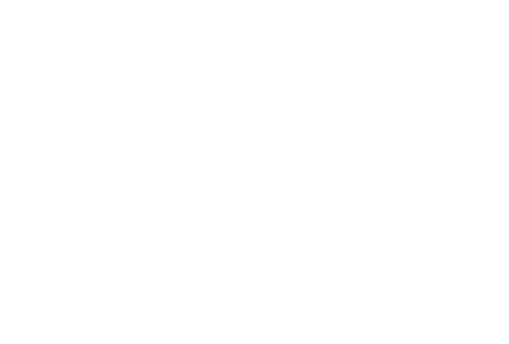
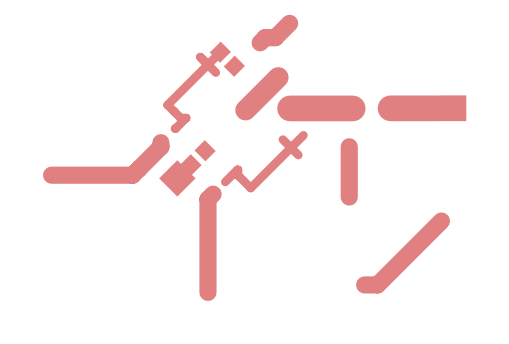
top track: none -> (289, 23) (275, 37) (265, 37) (260, 42)
top track: none -> (220, 52) (167, 105) (180, 118) (186, 118) (174, 128)
top track: none -> (200, 57) (215, 72)
part: none -> (227, 59)
top track: none -> (278, 77) (245, 110)
top track: none -> (352, 108) (290, 108)
top track: none -> (438, 108) (390, 108)
part: none -> (453, 108)
top track: none -> (303, 135) (250, 188) (237, 175) (237, 169) (225, 181)
top track: none -> (282, 139) (298, 155)
top track: none -> (160, 142) (160, 146) (132, 175) (51, 175)
top track: none -> (349, 146) (349, 197)
part: none -> (198, 157)
part: none -> (177, 178)
top track: none -> (213, 194) (207, 199) (207, 292)
top track: none -> (441, 221) (377, 284) (364, 284)

